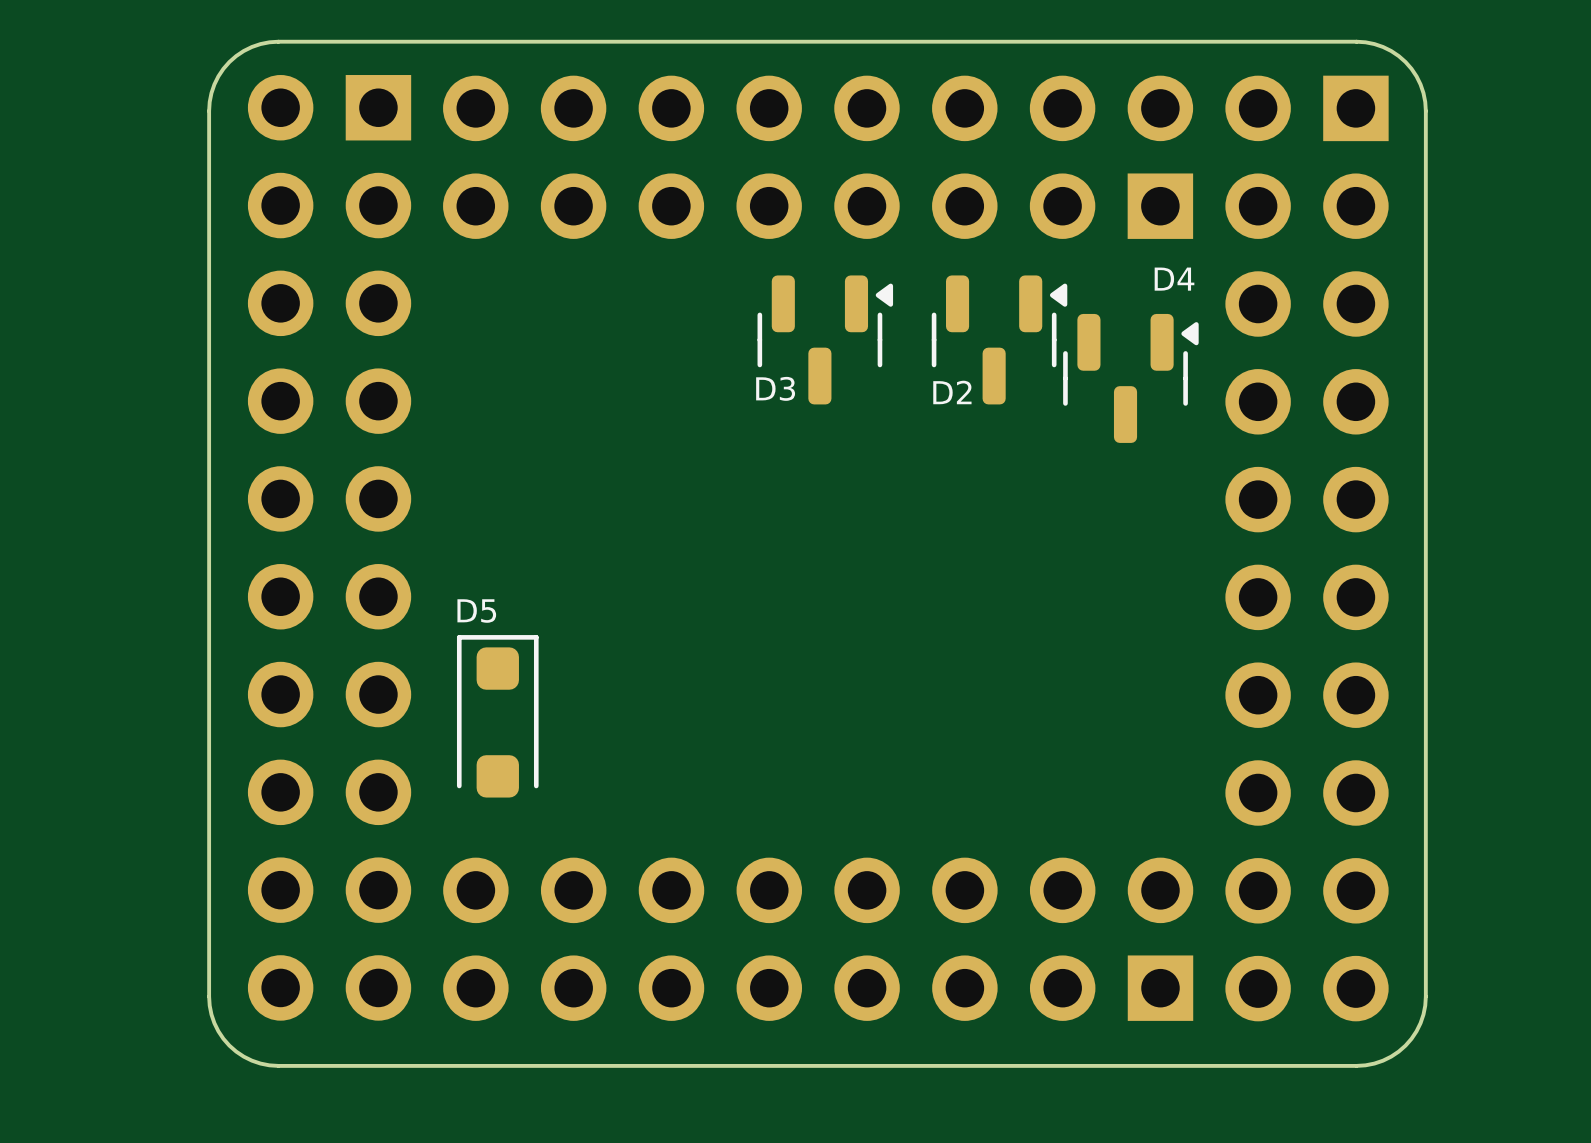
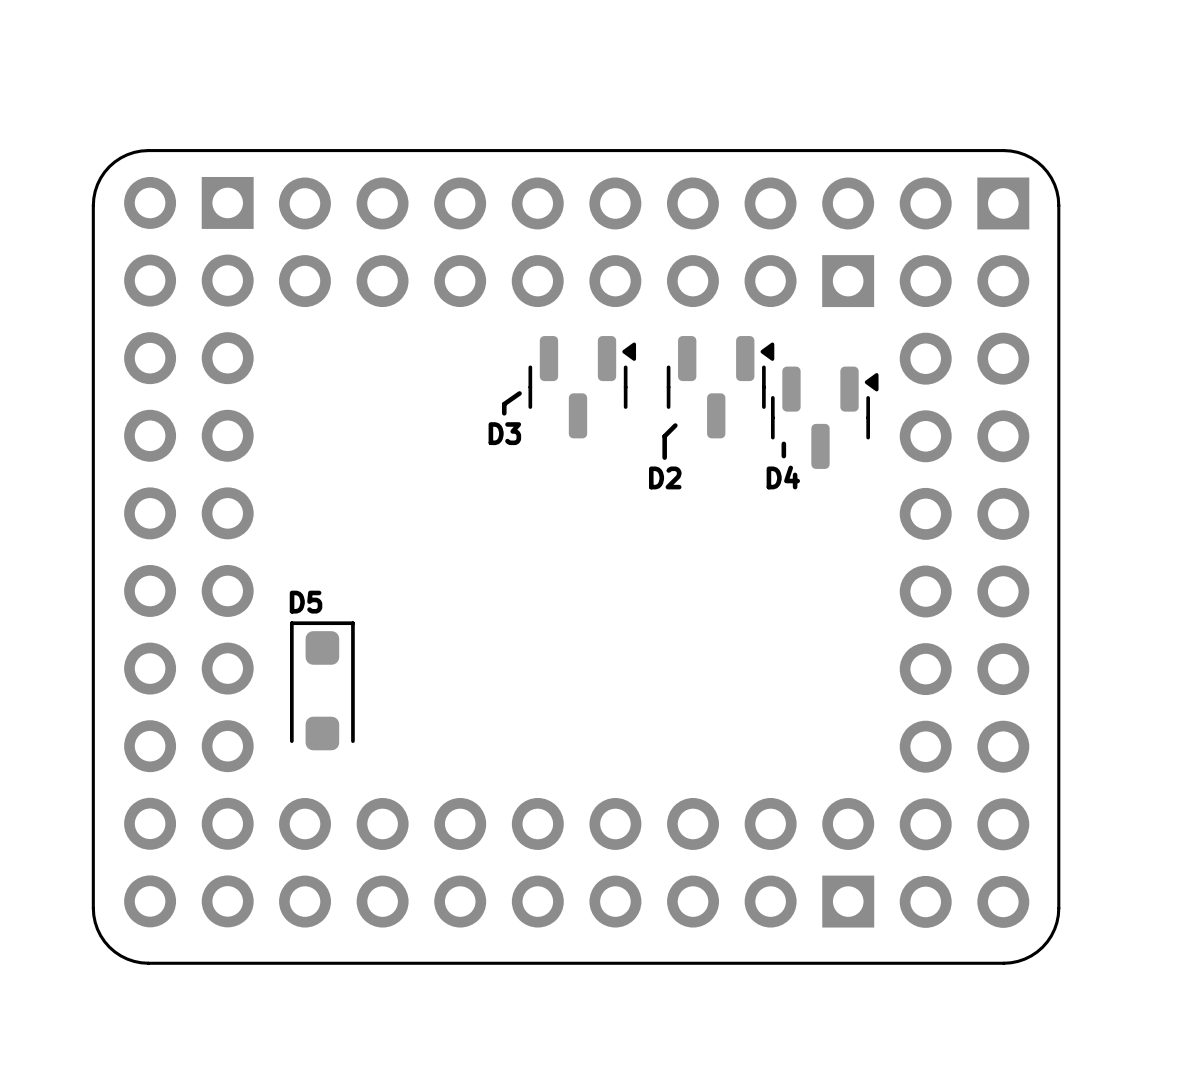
D4 name position: D4 (1174, 279) -> D4 (783, 477)
line: none -> (519, 393) (504, 404) (504, 413)
D3 name position: D3 (775, 388) -> D3 (504, 433)
line: none -> (675, 425) (664, 436) (664, 457)
D2 name position: D2 (952, 392) -> D2 (665, 477)
line: none -> (783, 443) (783, 456)

